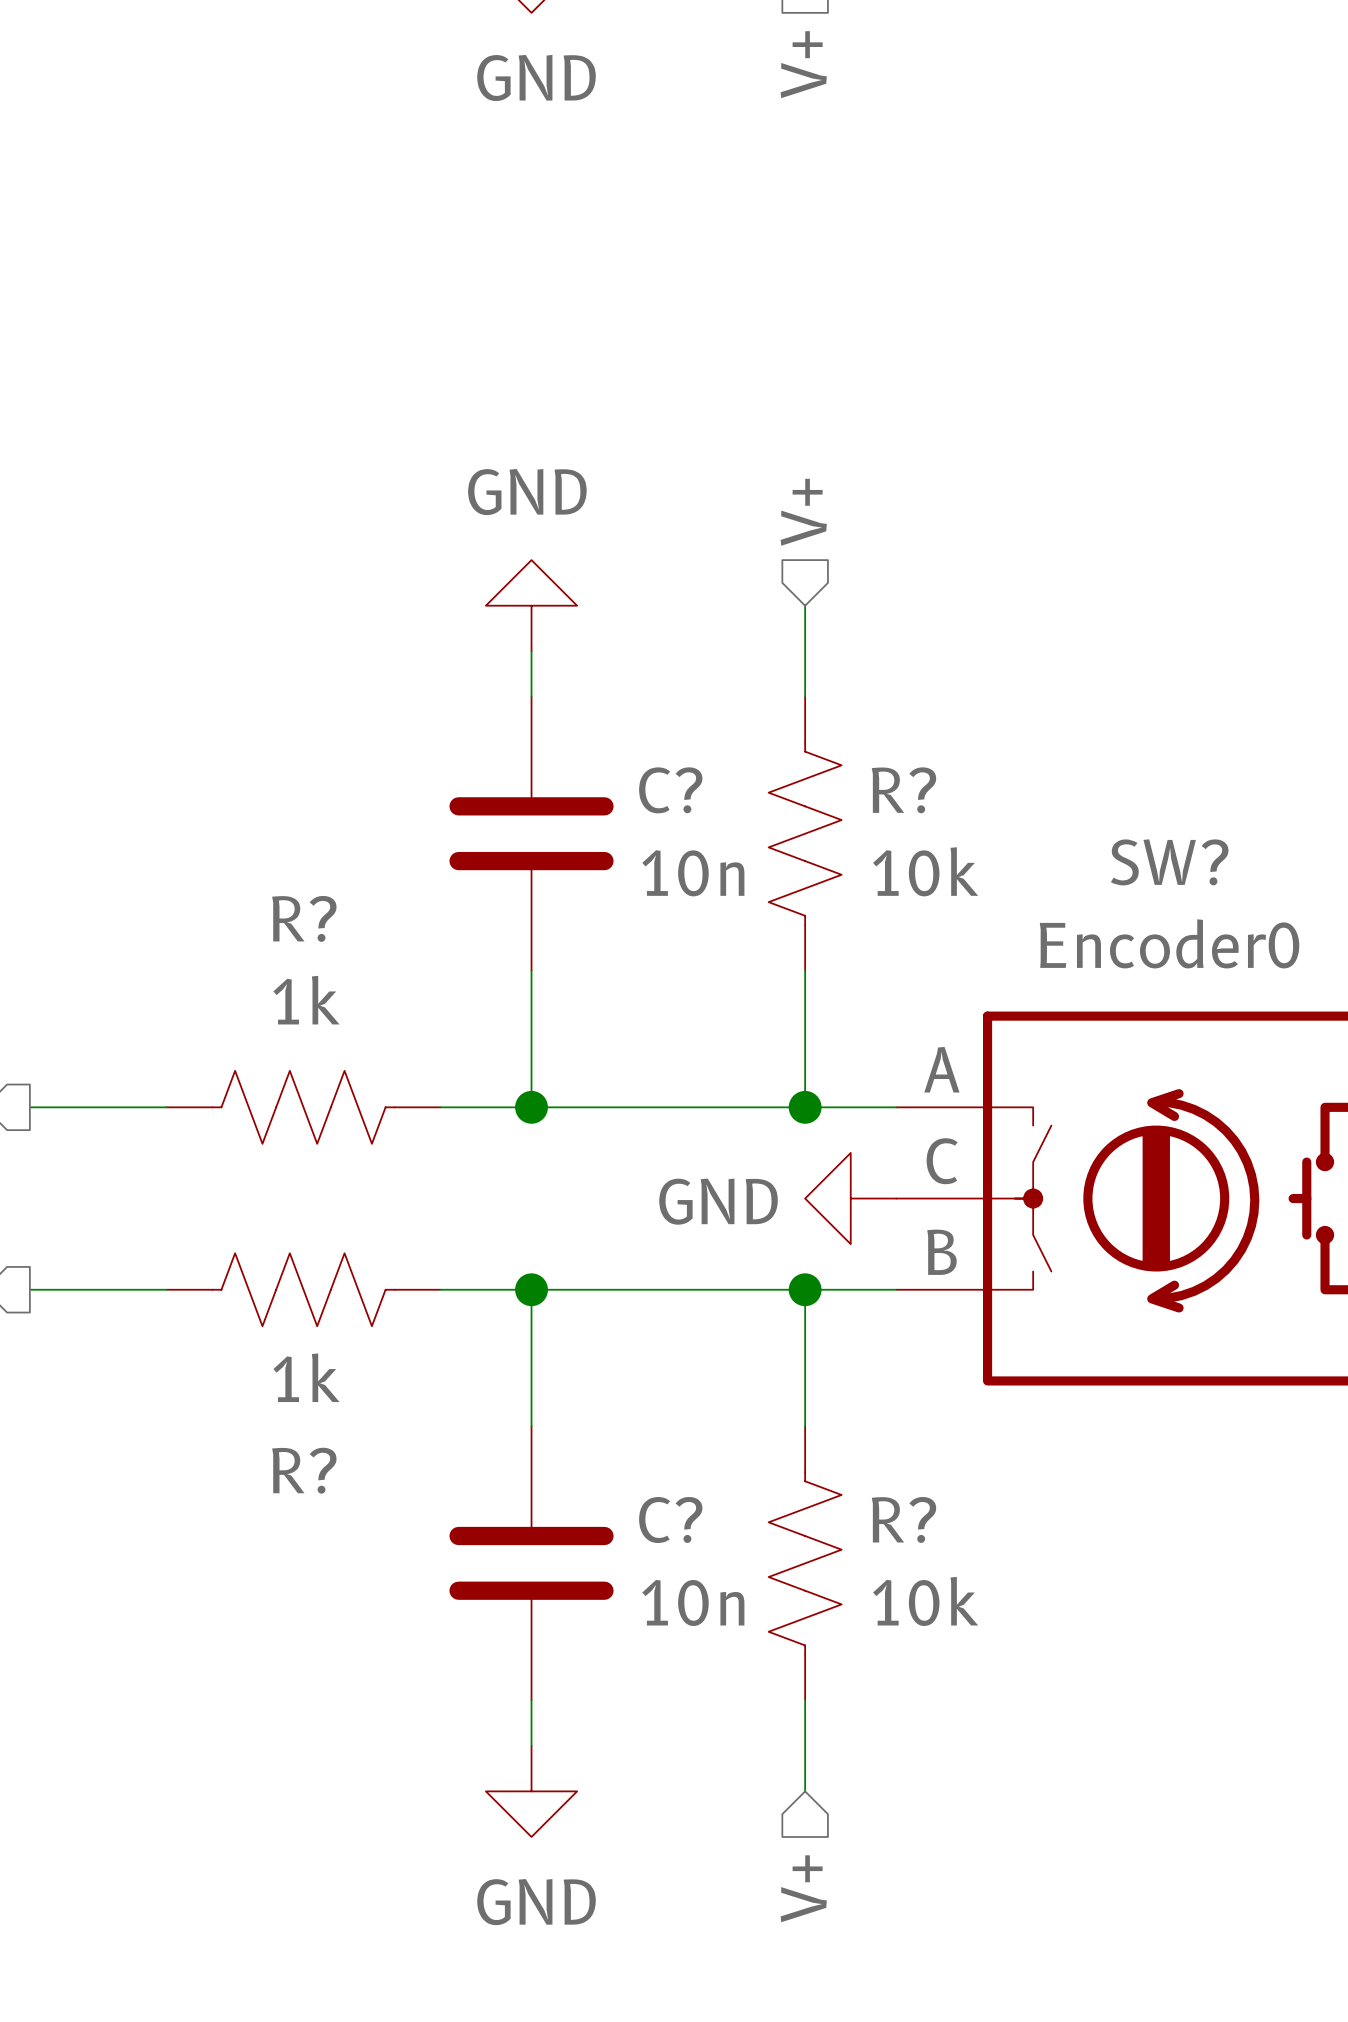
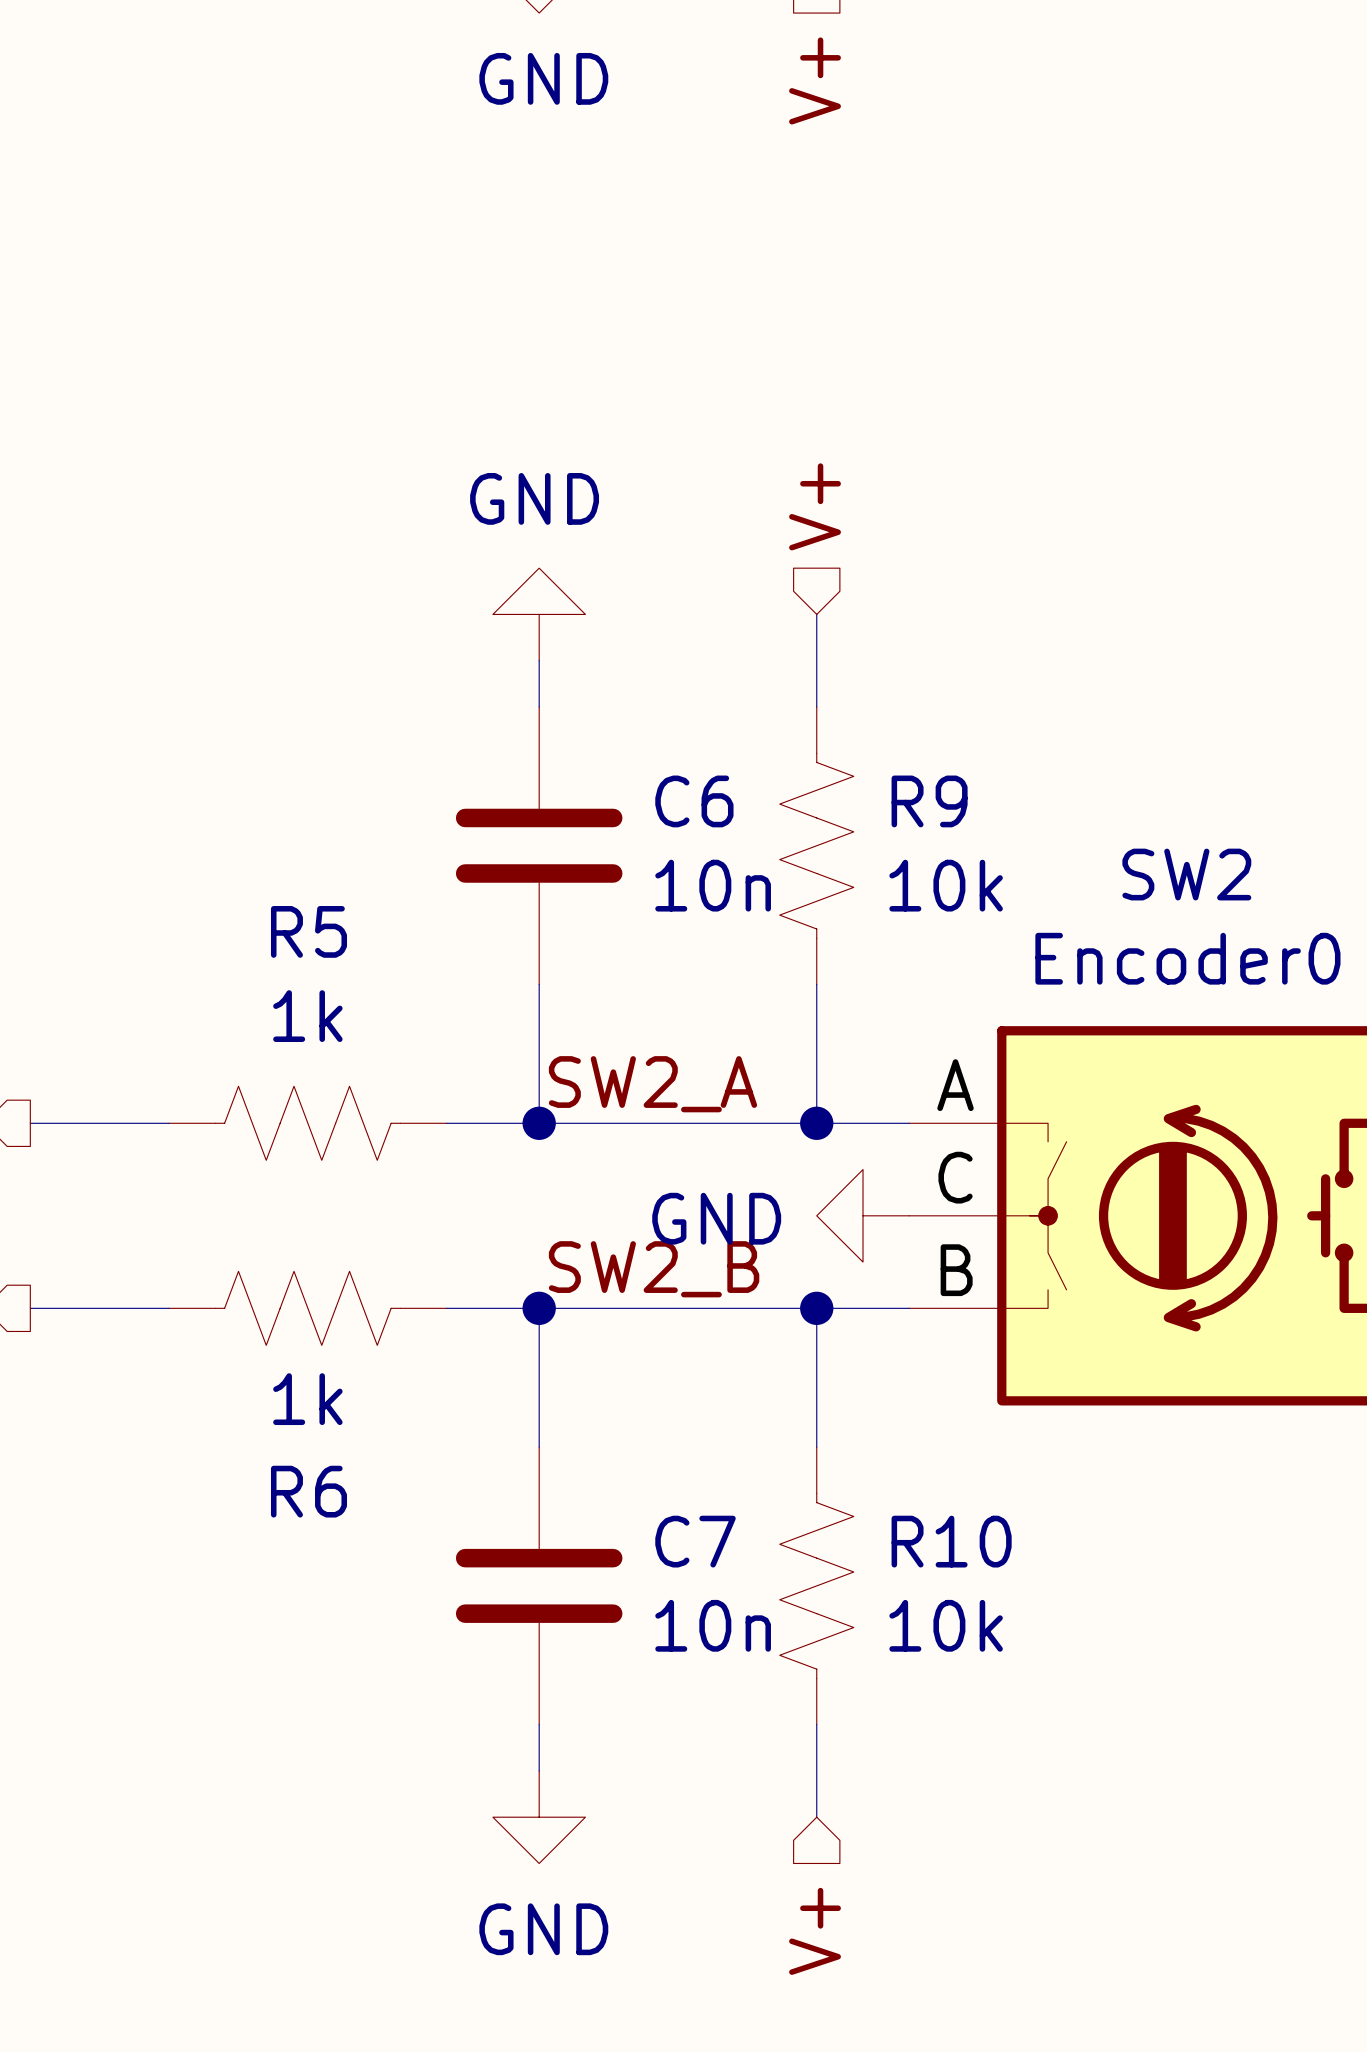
C? name: C? (670, 790) -> C6 (694, 801)
R? name: R? (903, 790) -> R9 (929, 801)
SW? name: SW? (1169, 862) -> SW2 (1186, 874)
R? name: R? (304, 918) -> R5 (308, 931)
label: none -> SW2_A (652, 1084)
label: none -> SW2_B (654, 1269)
R? name: R? (304, 1470) -> R6 (308, 1491)
R? name: R? (903, 1519) -> R10 (951, 1541)
C? name: C? (670, 1520) -> C7 (695, 1541)

